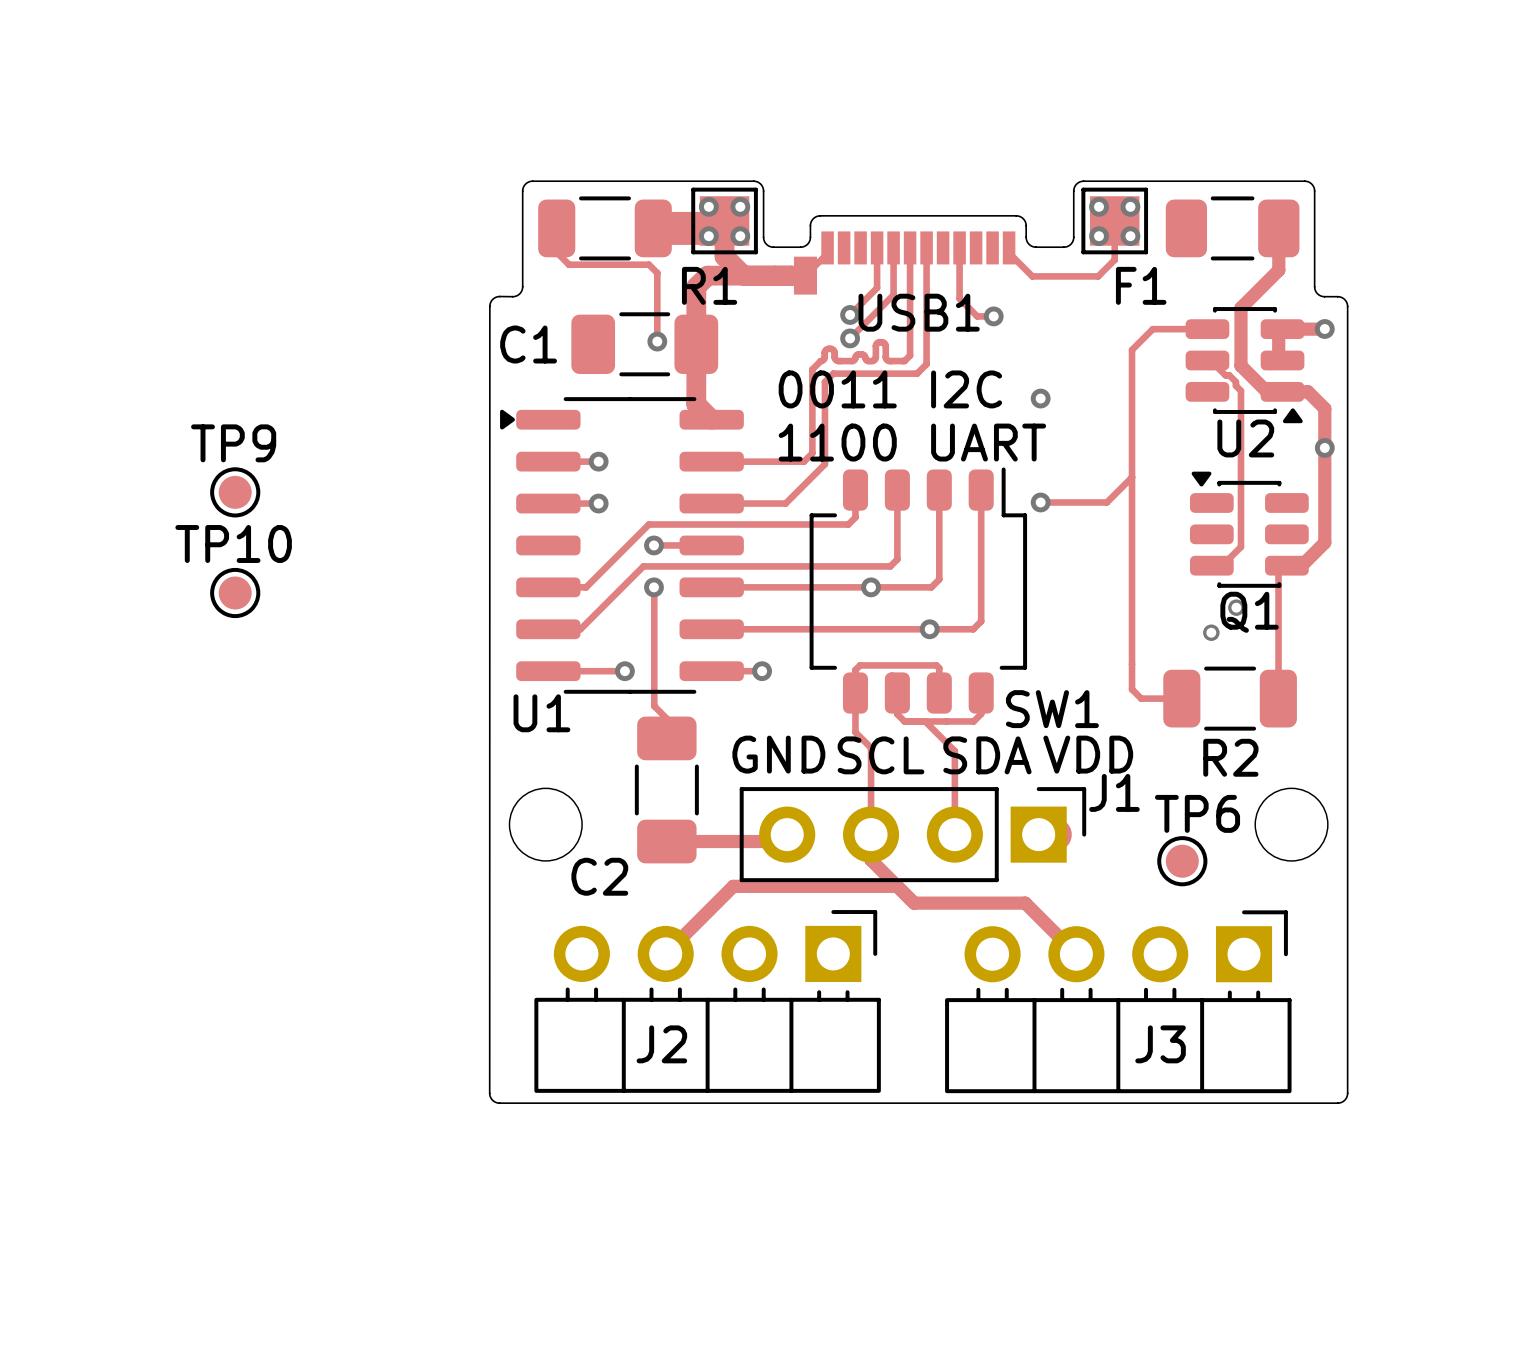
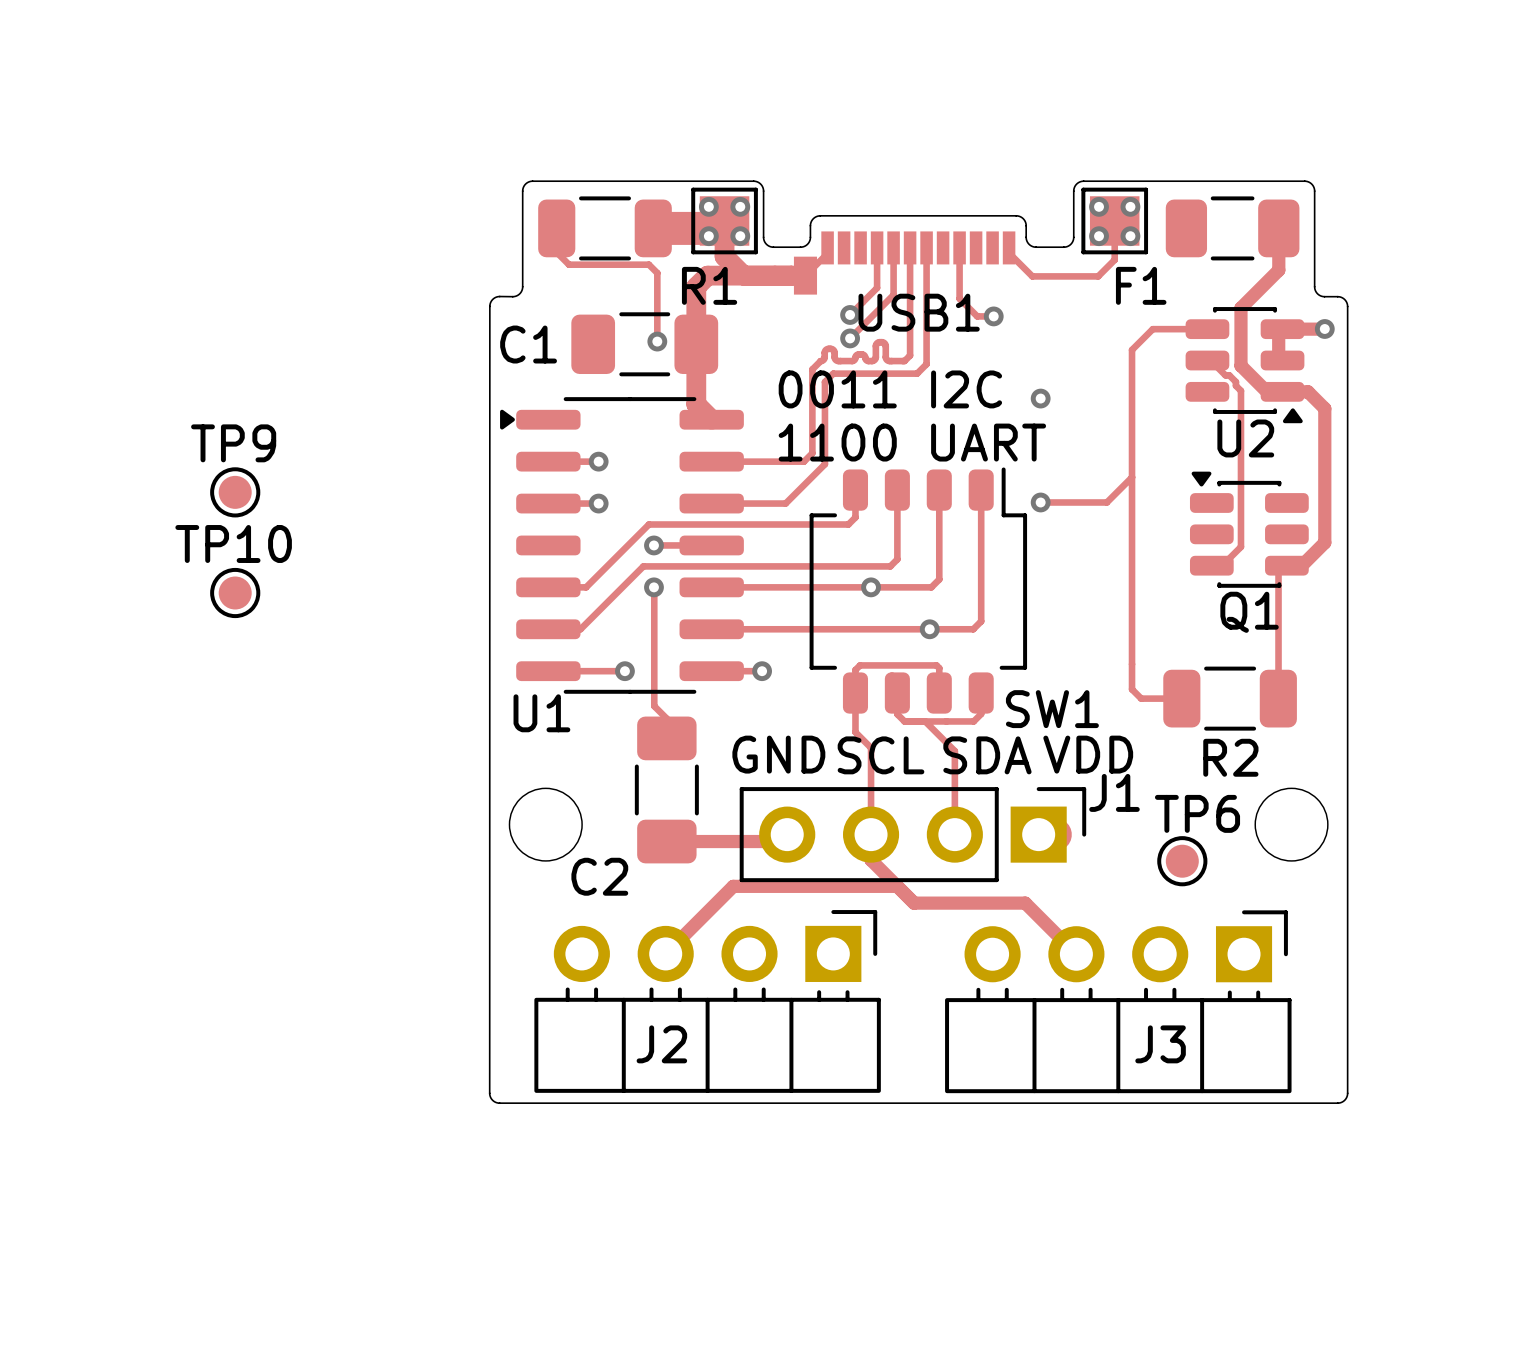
via: (1324, 447) -> none
via: (1236, 607) -> none
via: (1211, 632) -> none

